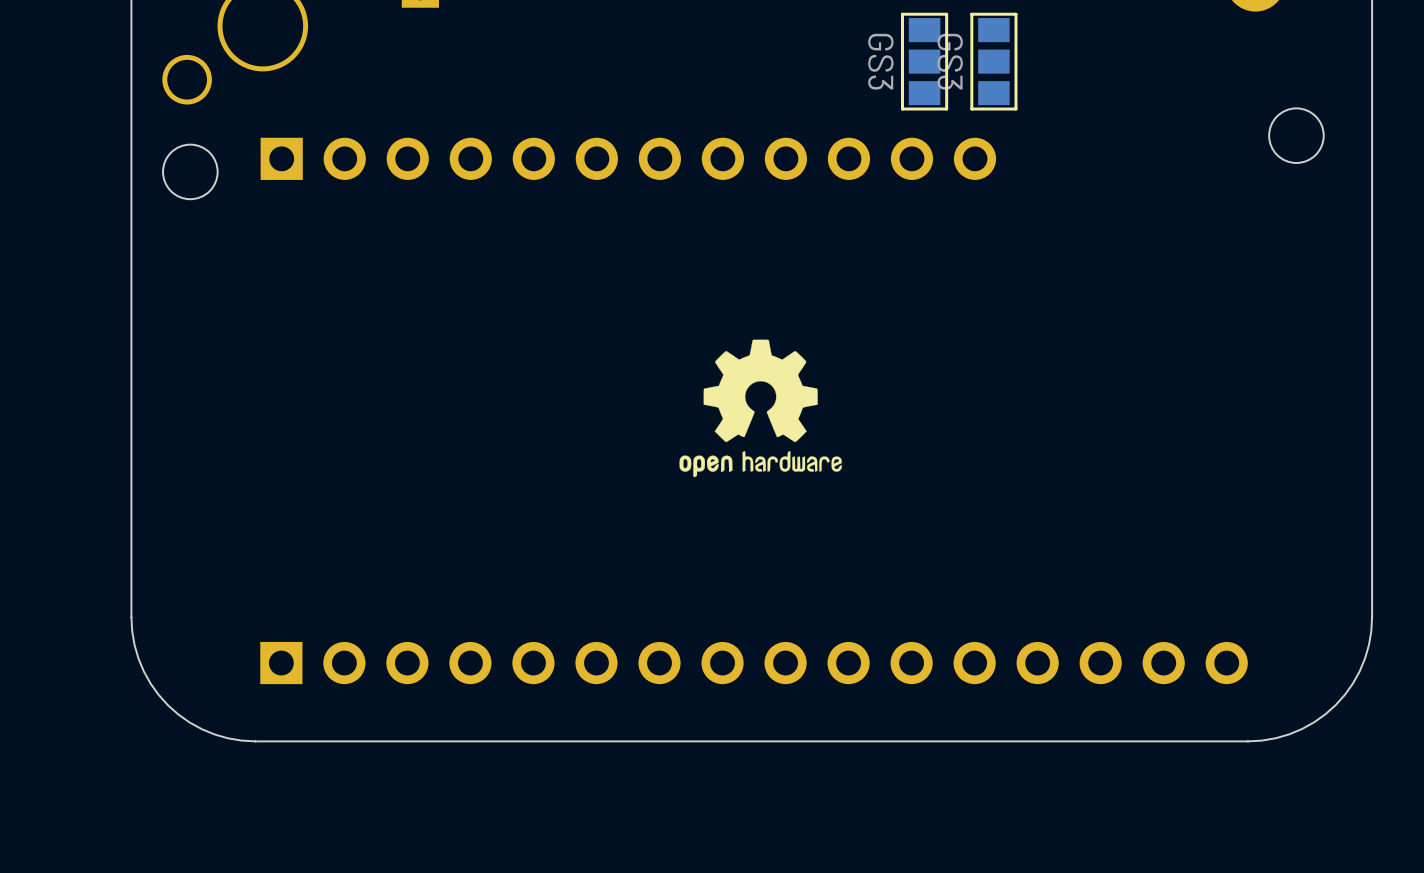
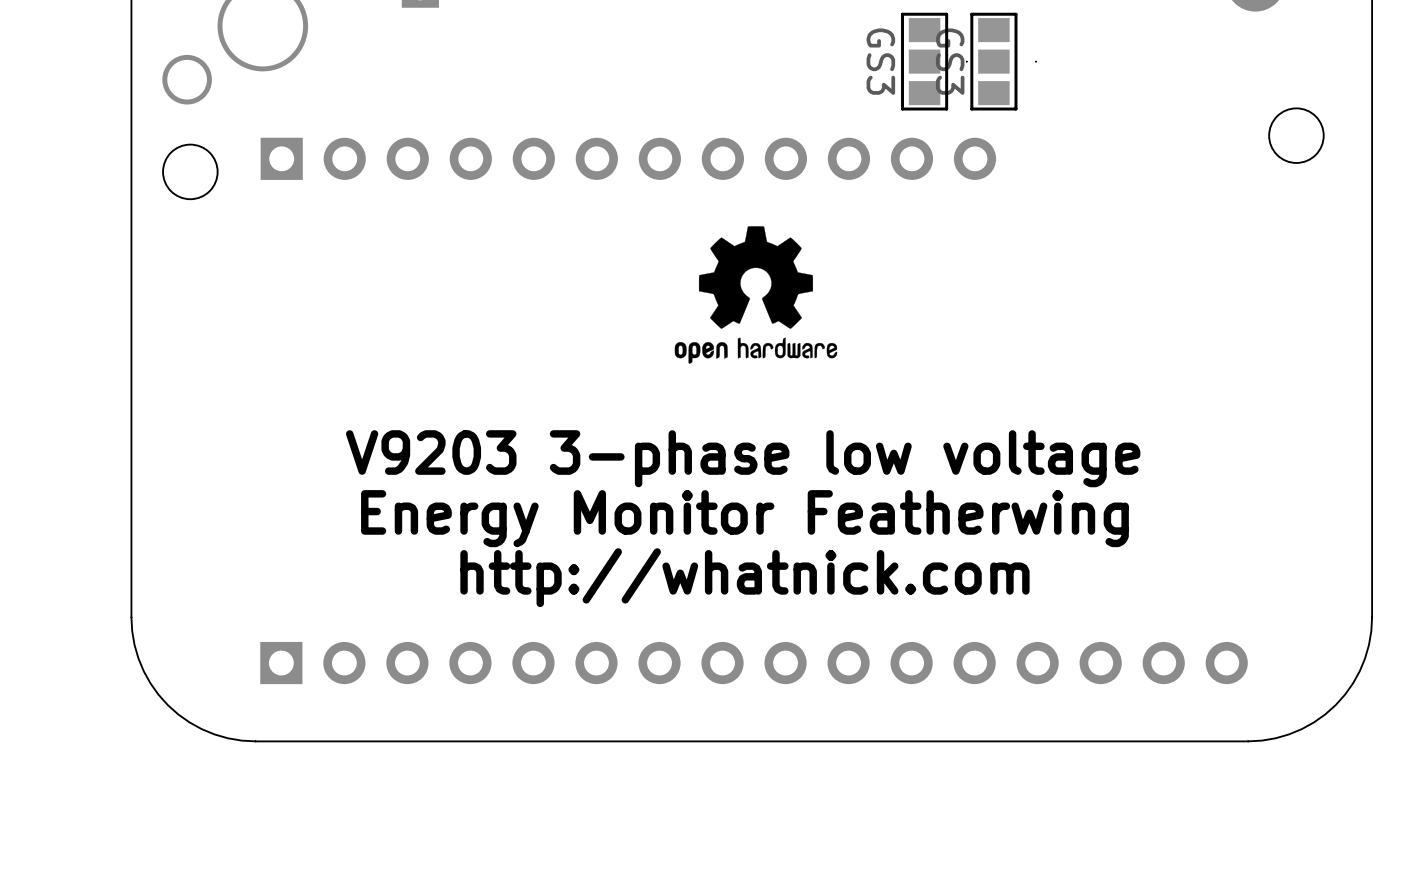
drawing position: (760, 408) -> (755, 294)
text: none -> V9203 3-phase low voltage (743, 458)
text: none -> Energy Monitor Featherwing (744, 518)
text: none -> http://whatnick.com (744, 577)

